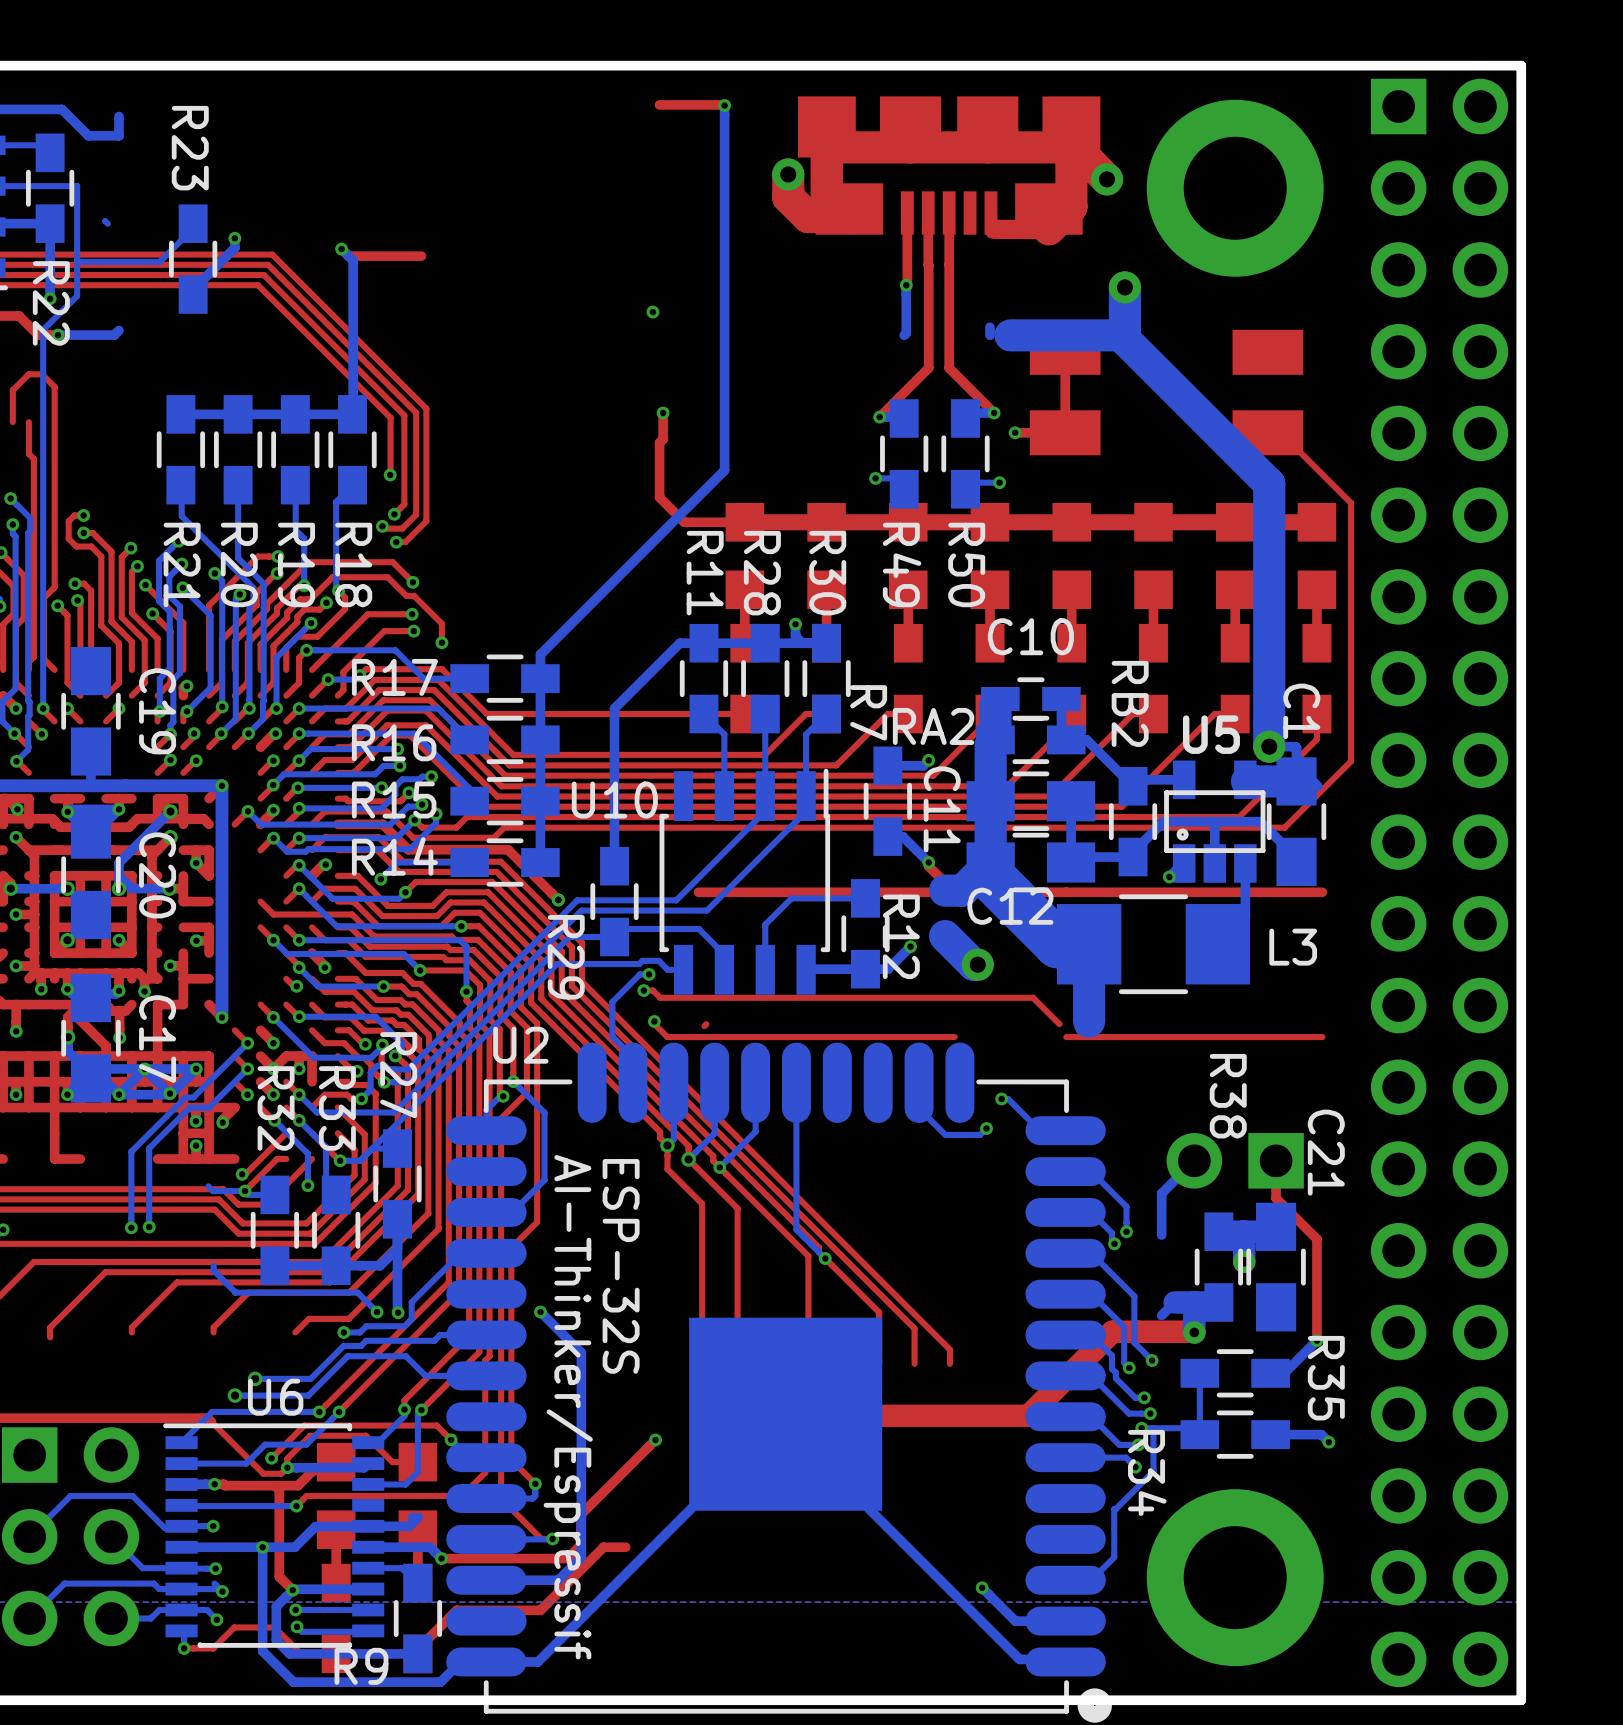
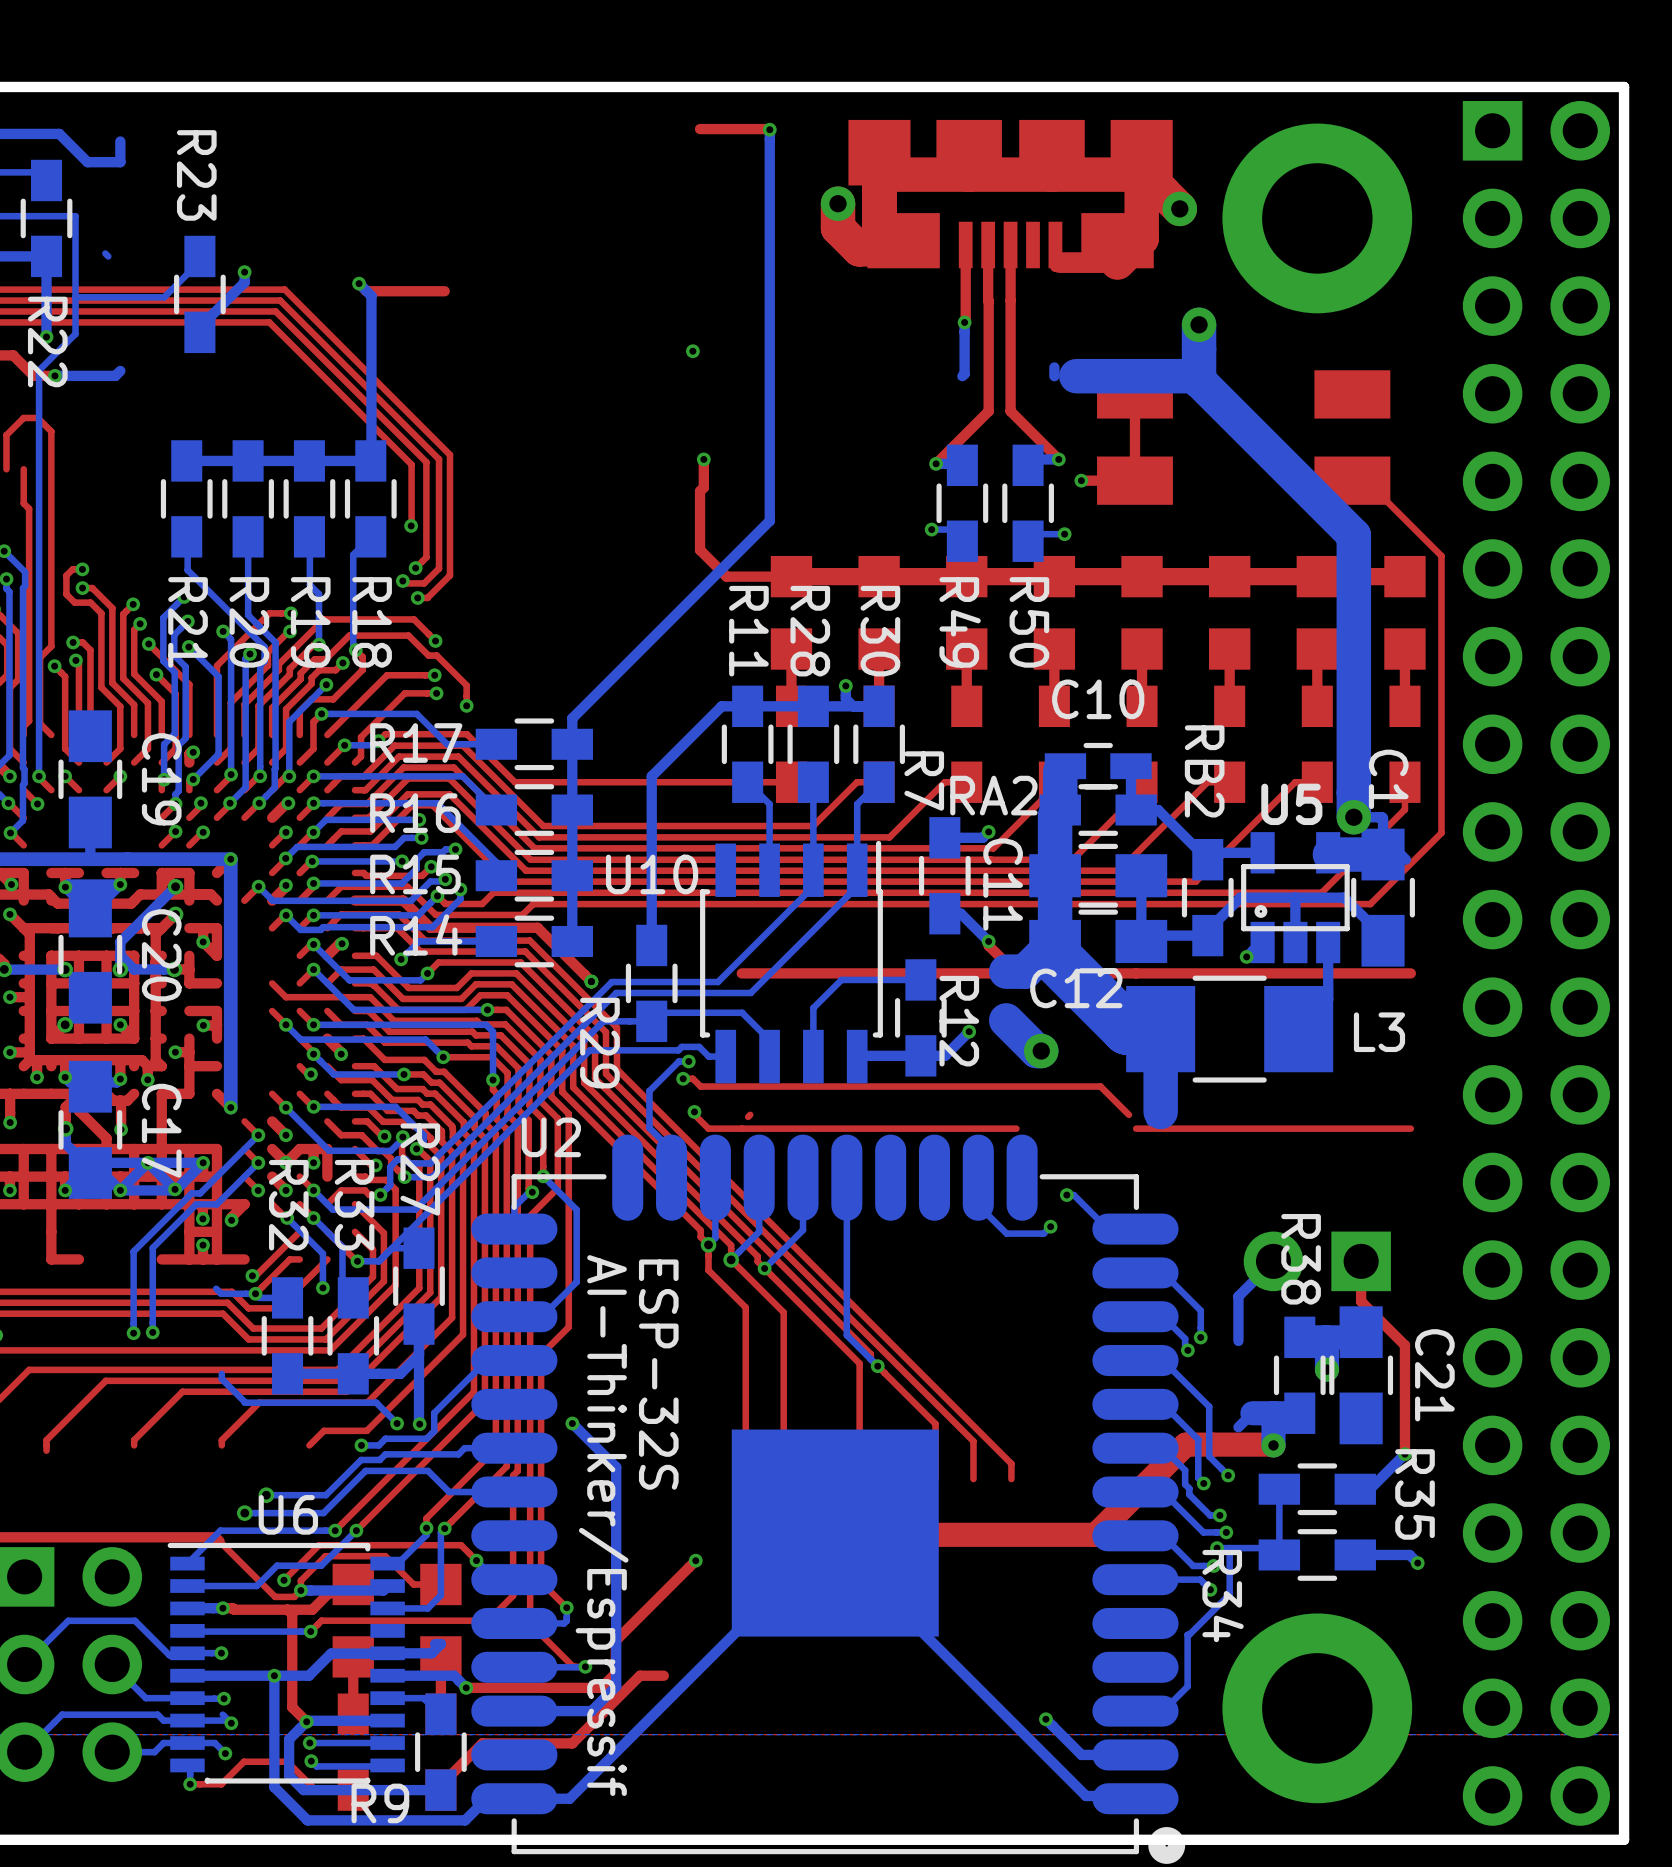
R38 name position: R38 (1228, 1096) -> R38 (1301, 1259)
C21 name position: C21 (1326, 1152) -> C21 (1434, 1375)

